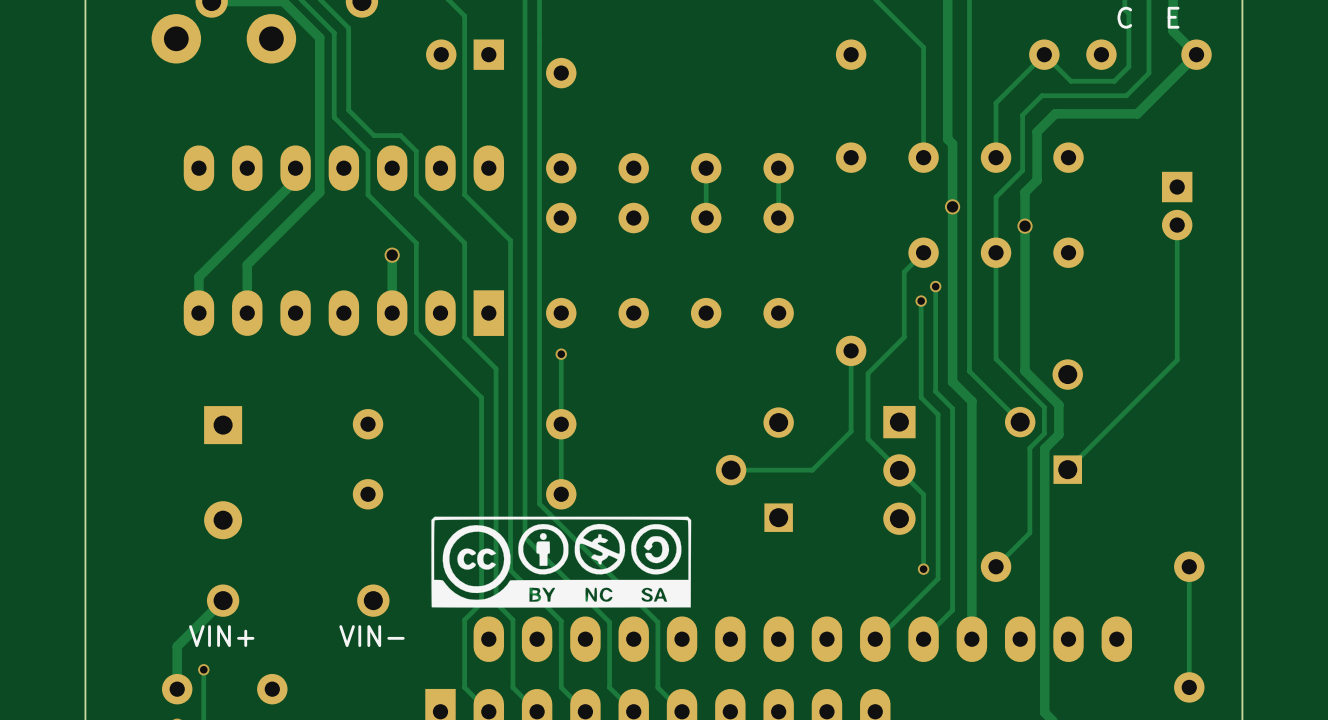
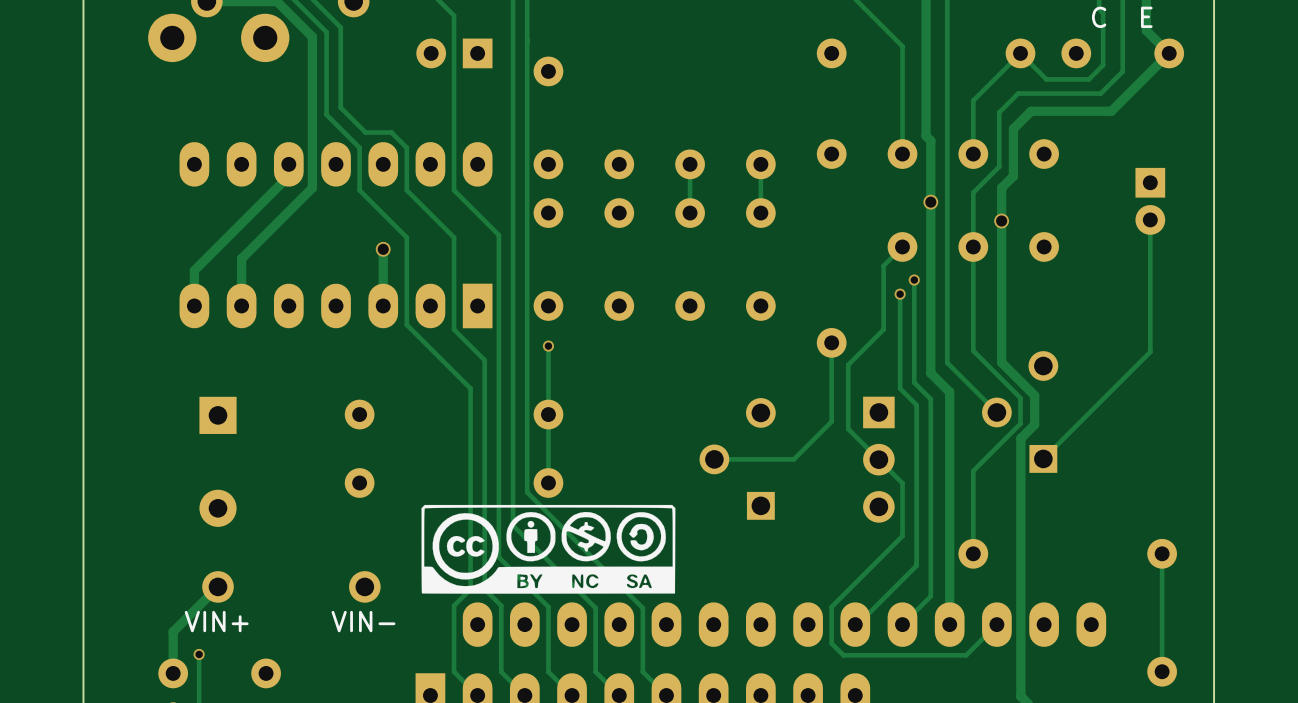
track: (1029, 448) (1029, 532) (996, 566) -> (1006, 437) (973, 470) (973, 553)
track: (923, 548) (923, 569) -> (902, 536) (831, 606) (831, 643) (843, 655) (966, 655) (996, 624)
via: (923, 569) -> none

